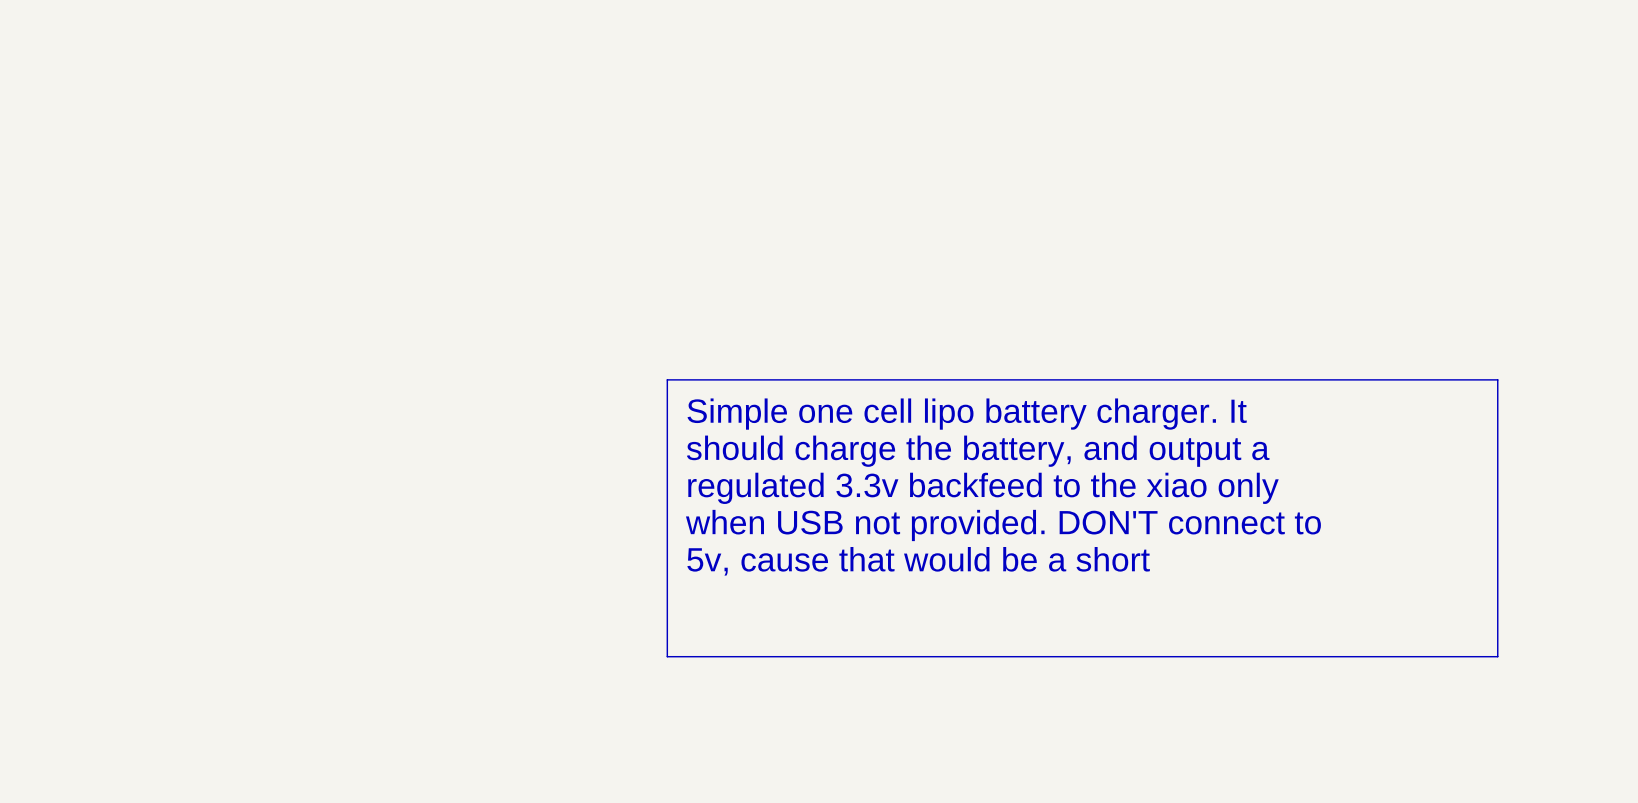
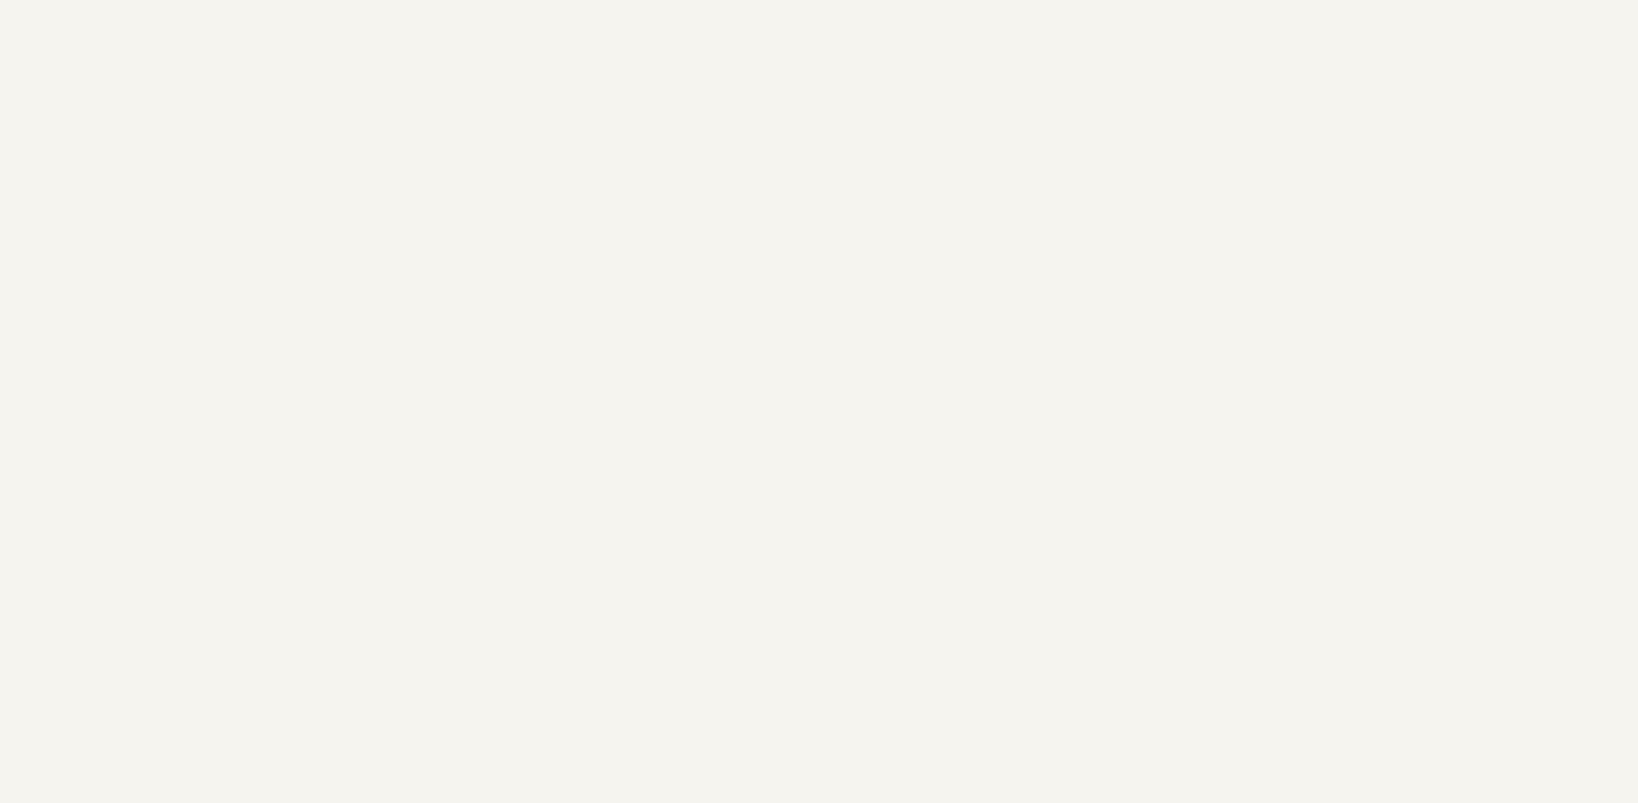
line: (667, 379) (1497, 379) (1497, 656) (667, 656) (667, 379) -> none
text: Simple one cell lipo battery charger. It (967, 414) -> none
text: should charge the battery, and output a (978, 451) -> none
text: regulated 3.3v backfeed to the xiao only (983, 488) -> none
text: when USB not provided. DON'T connect to (1003, 525) -> none
text: 5v, cause that would be a short (918, 561) -> none

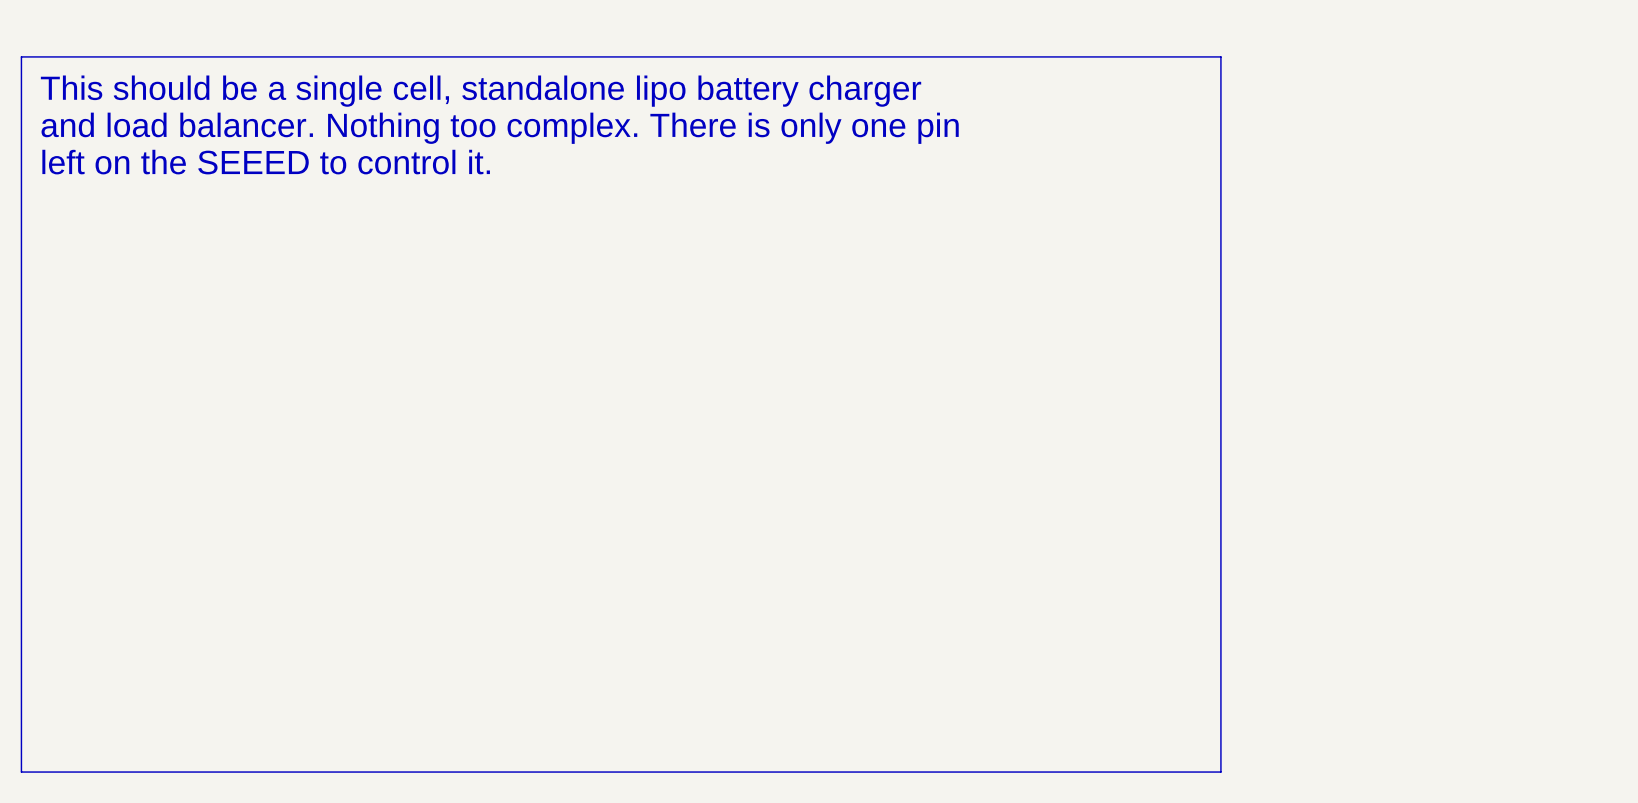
line: none -> (21, 56) (1220, 56) (1220, 772) (21, 772) (21, 56)
text: none -> This should be a single cell, standalone lipo battery charger (481, 91)
text: none -> and load balancer. Nothing too complex. There is only one pin (500, 128)
text: none -> left on the SEEED to control it. (266, 162)

